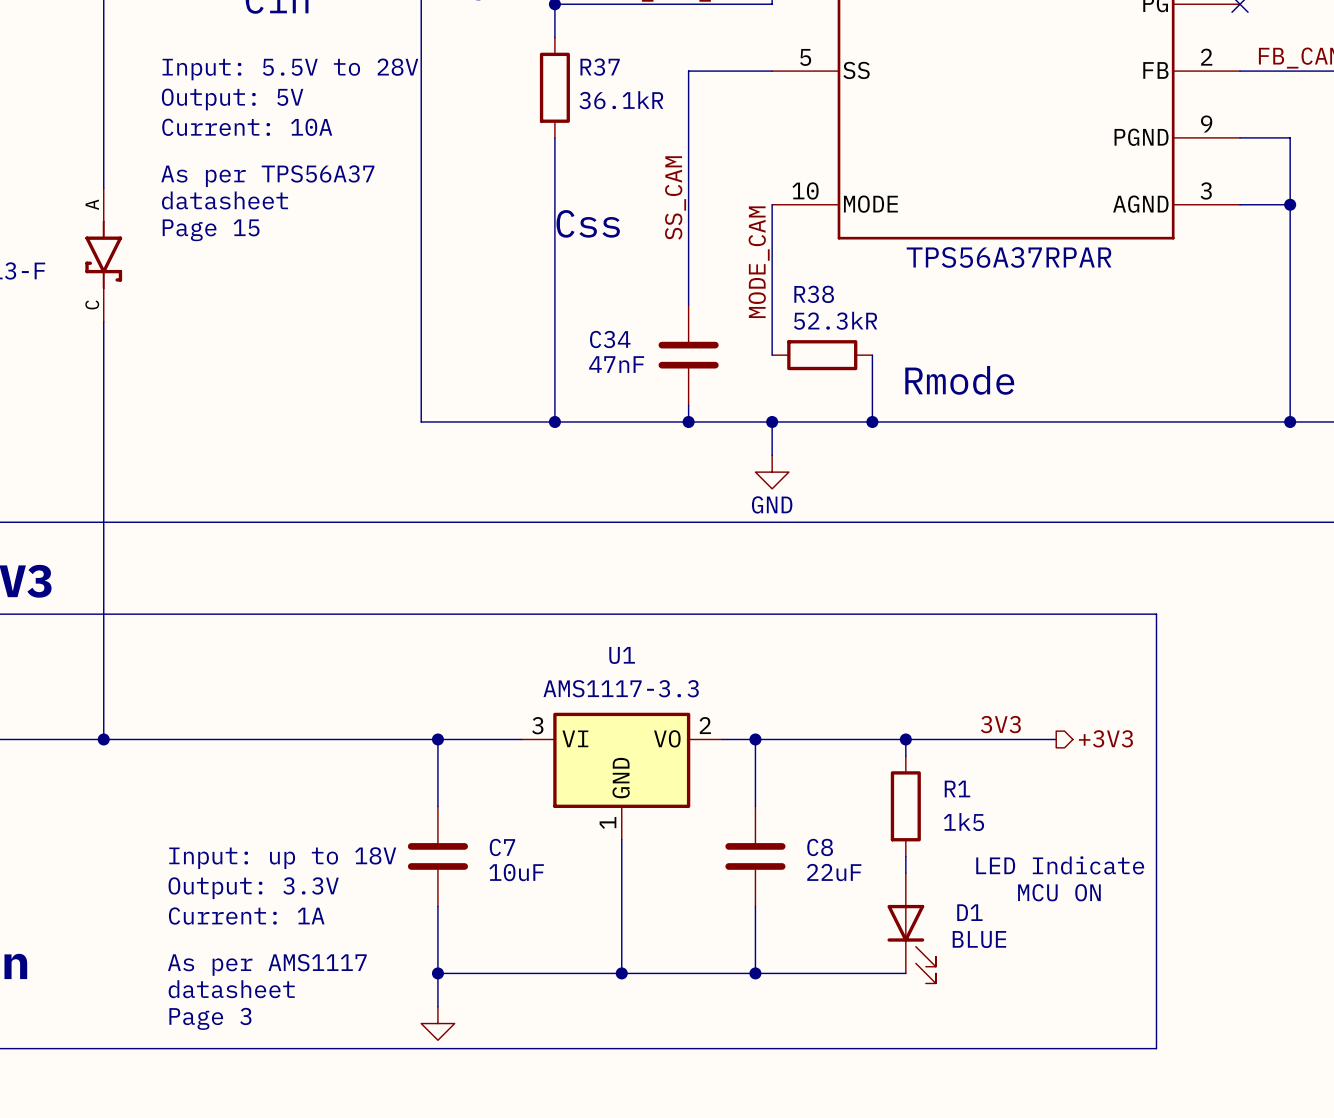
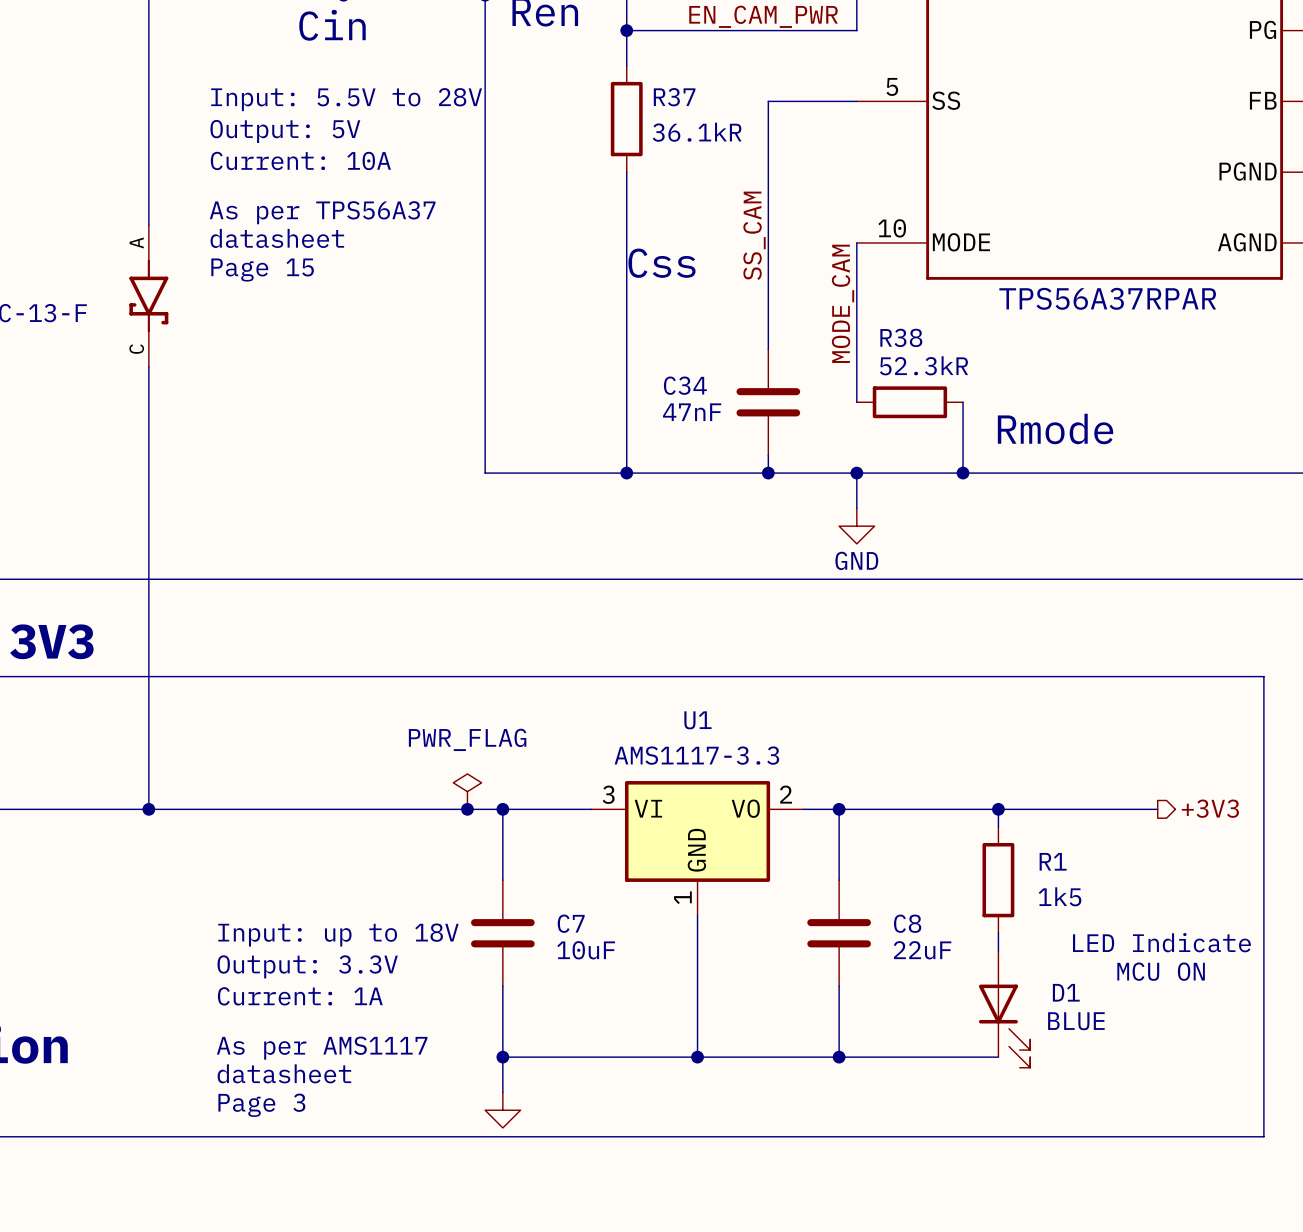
power symbol: none -> PWR_FLAG (467, 791)
label: 3V3 (1000, 724) -> none
junction: none -> (467, 809)

